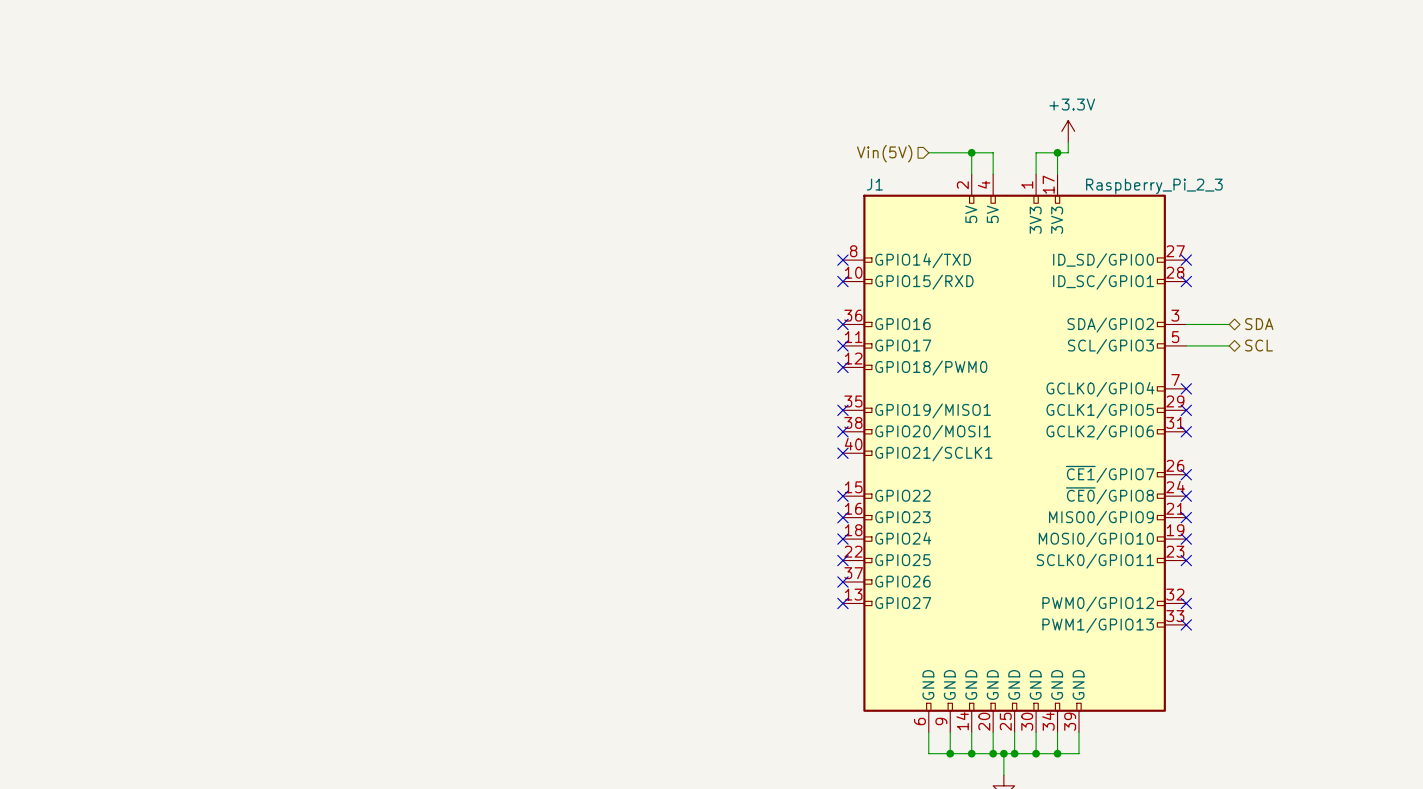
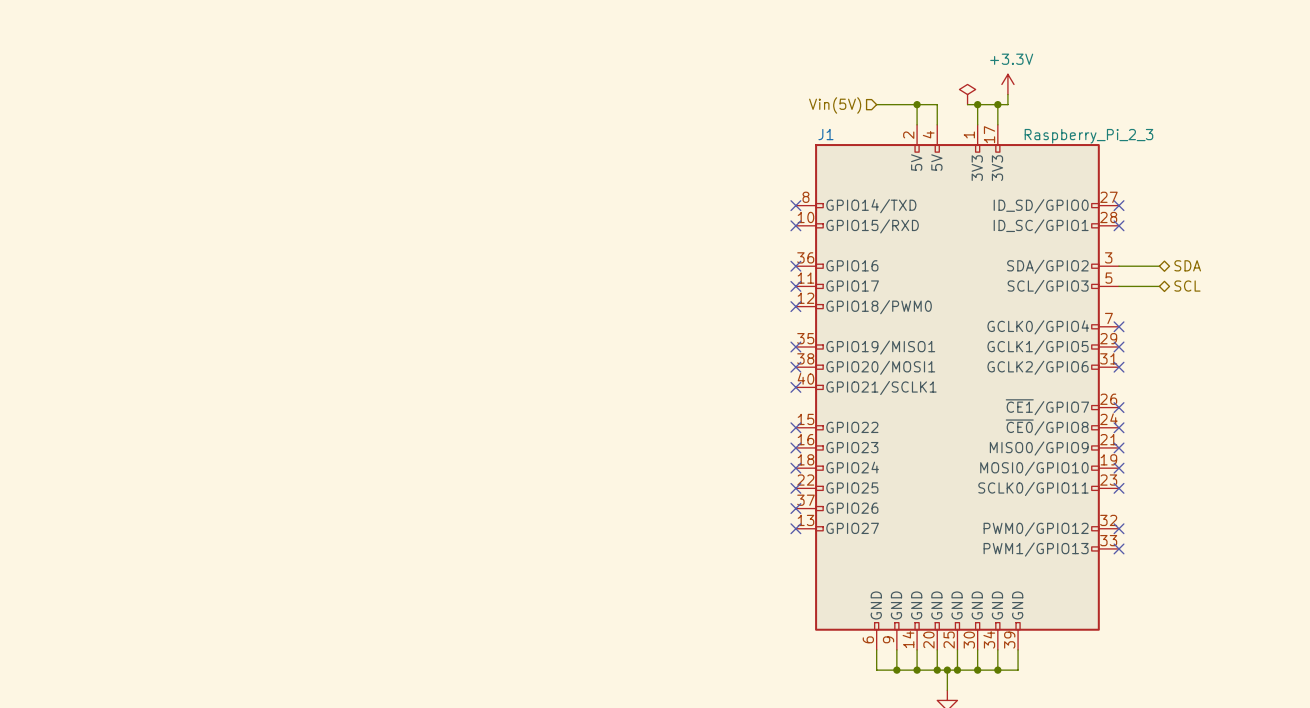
power symbol: none -> (967, 94)
wire: none -> (967, 104) (977, 104)
junction: none -> (977, 104)

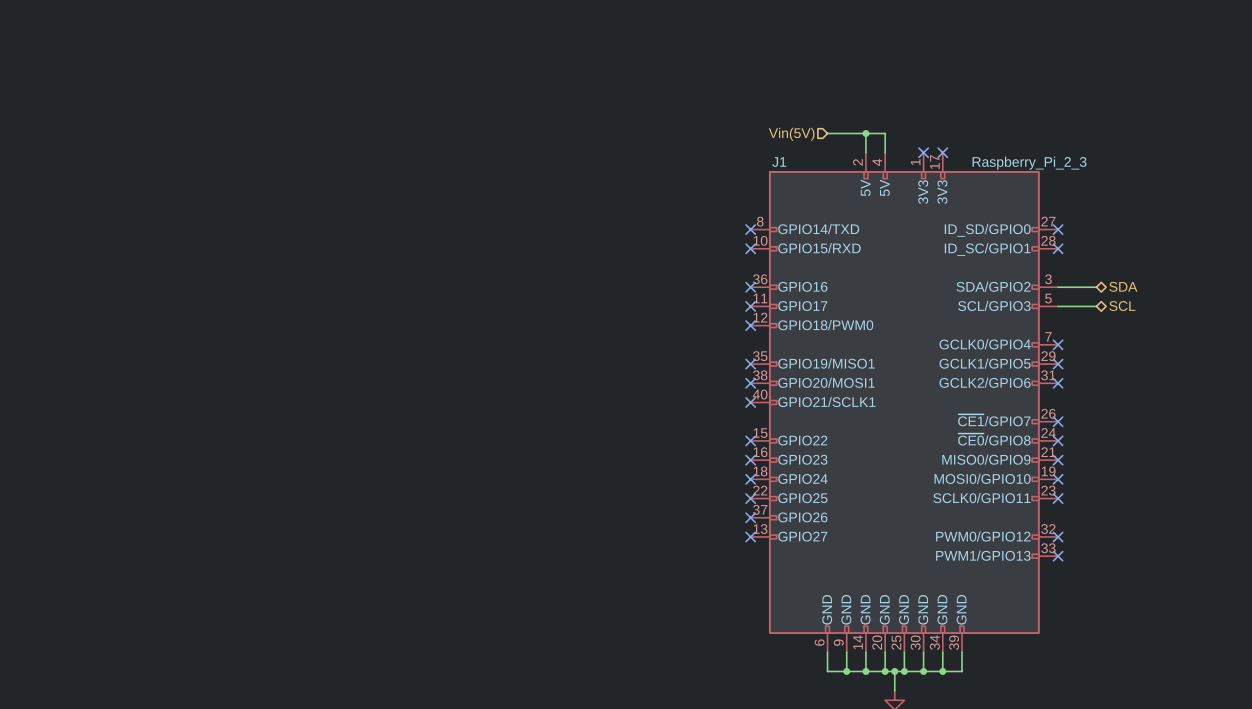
power symbol: +3.3V (1007, 84) -> none
power symbol: (967, 94) -> none
wire: (1007, 94) (1007, 104) (967, 104) -> none
wire: (977, 104) (977, 124) -> none
junction: (977, 104) -> none
wire: (997, 104) (997, 124) -> none
junction: (997, 104) -> none
no-connect mark: none -> (923, 152)
no-connect mark: none -> (942, 152)

